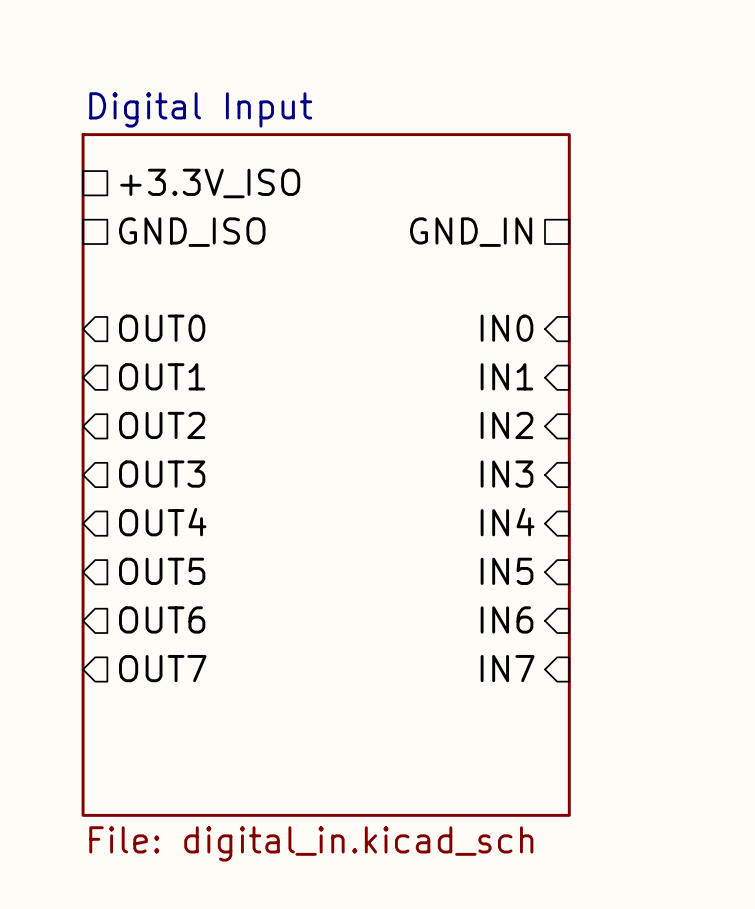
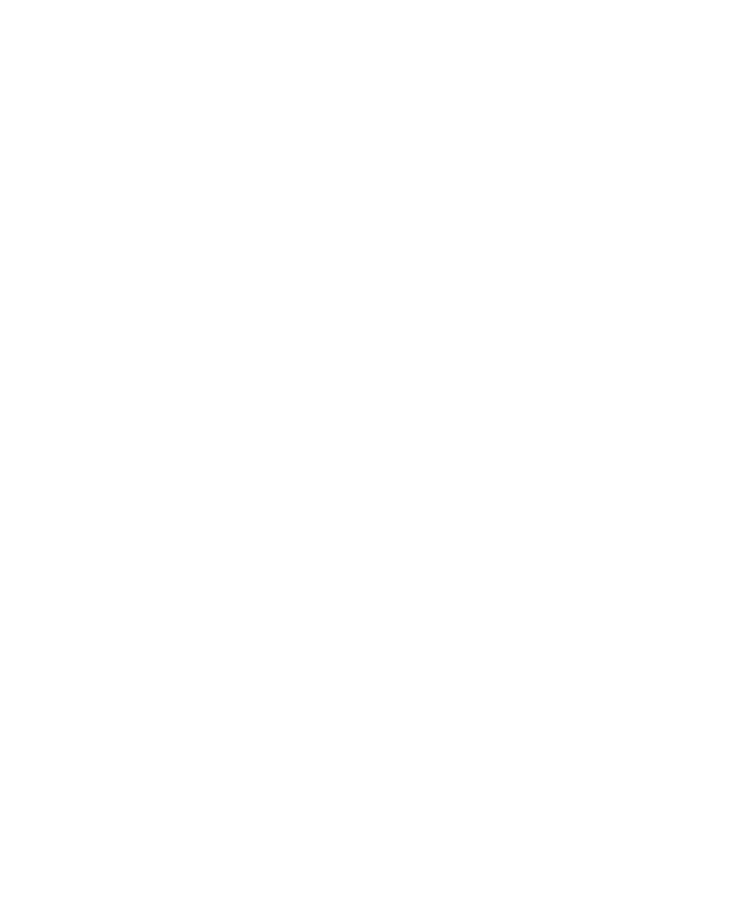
sheet pin: +3.3V_ISO (210, 183) -> none
sheet pin: GND_ISO (192, 232) -> none
sheet pin: GND_IN (471, 232) -> none
sheet pin: OUT0 (162, 328) -> none
sheet pin: IN0 (506, 328) -> none
sheet pin: OUT1 (162, 376) -> none
sheet pin: IN1 (506, 376) -> none
sheet pin: OUT2 (162, 425) -> none
sheet pin: IN2 (506, 425) -> none
sheet pin: OUT3 (162, 474) -> none
sheet Digital Input: File: digital_in.kicad_sch (326, 474) -> none
sheet pin: IN3 (506, 474) -> none
sheet pin: OUT4 (162, 522) -> none
sheet pin: IN4 (507, 522) -> none
sheet pin: OUT5 (162, 571) -> none
sheet pin: IN5 (506, 571) -> none
sheet pin: OUT6 (162, 619) -> none
sheet pin: IN6 (506, 619) -> none
sheet pin: OUT7 (162, 668) -> none
sheet pin: IN7 (507, 668) -> none

